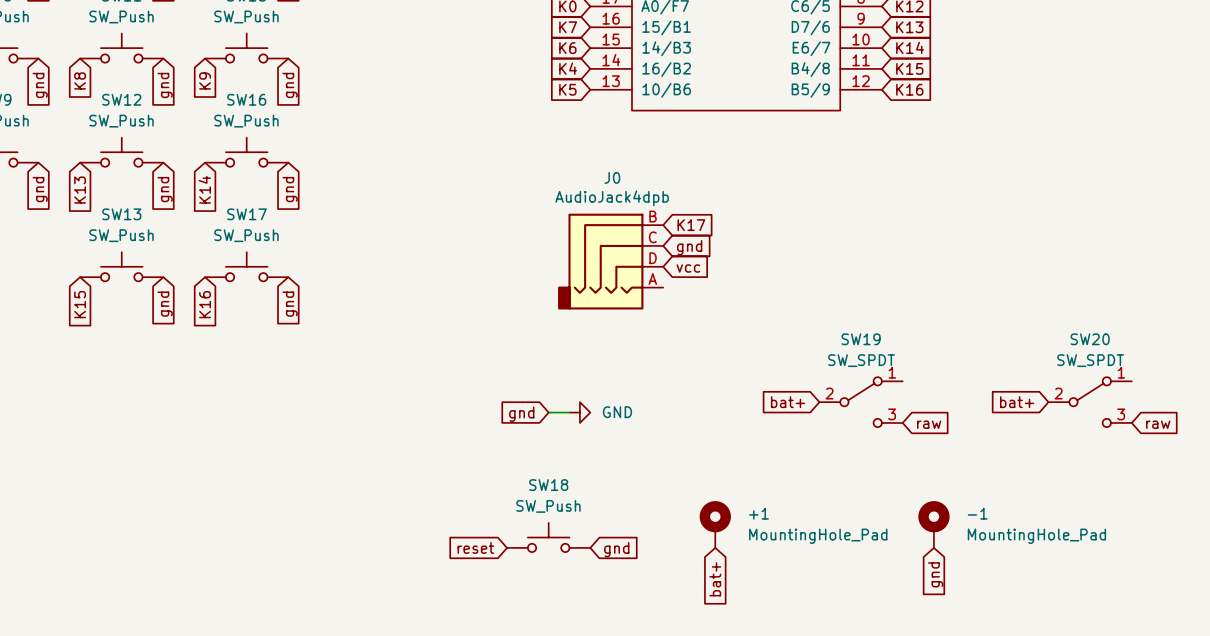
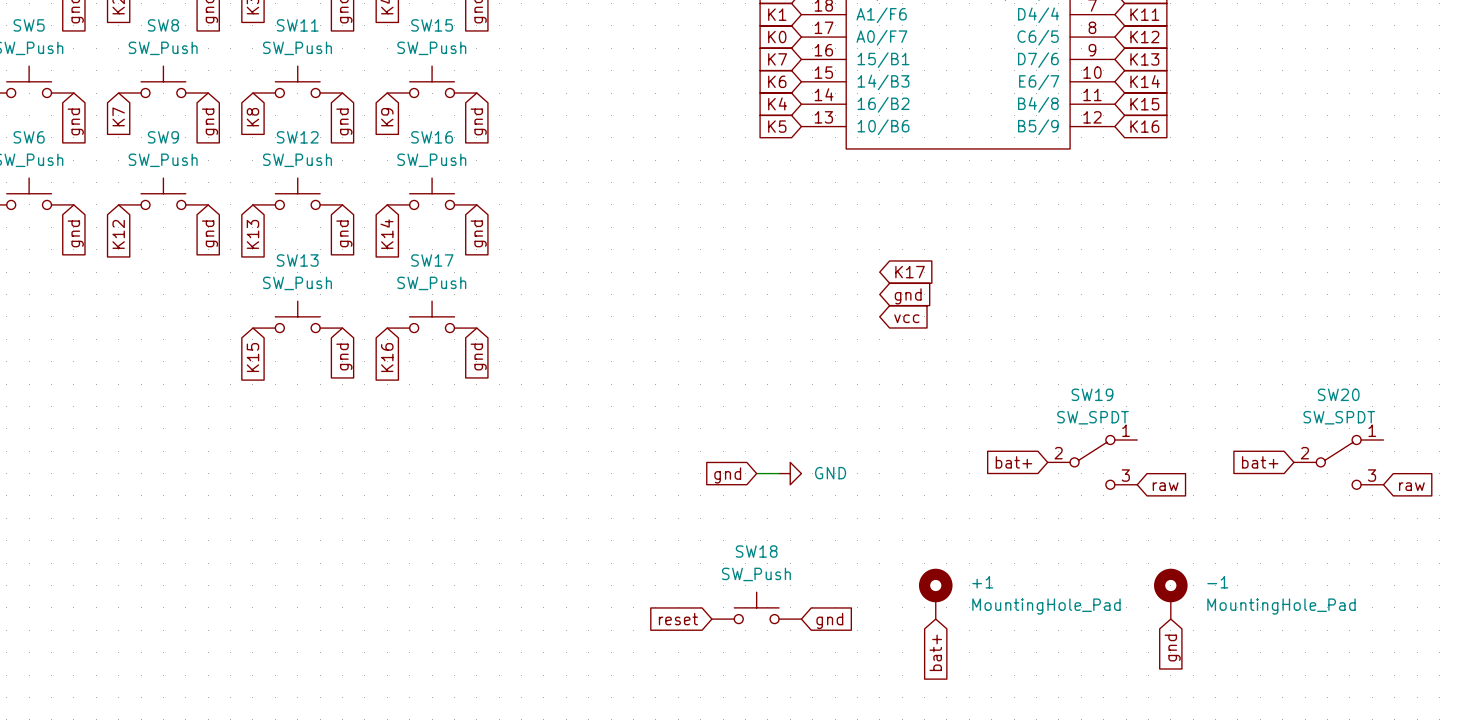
J0: AudioJack4dpb (610, 261) -> none

